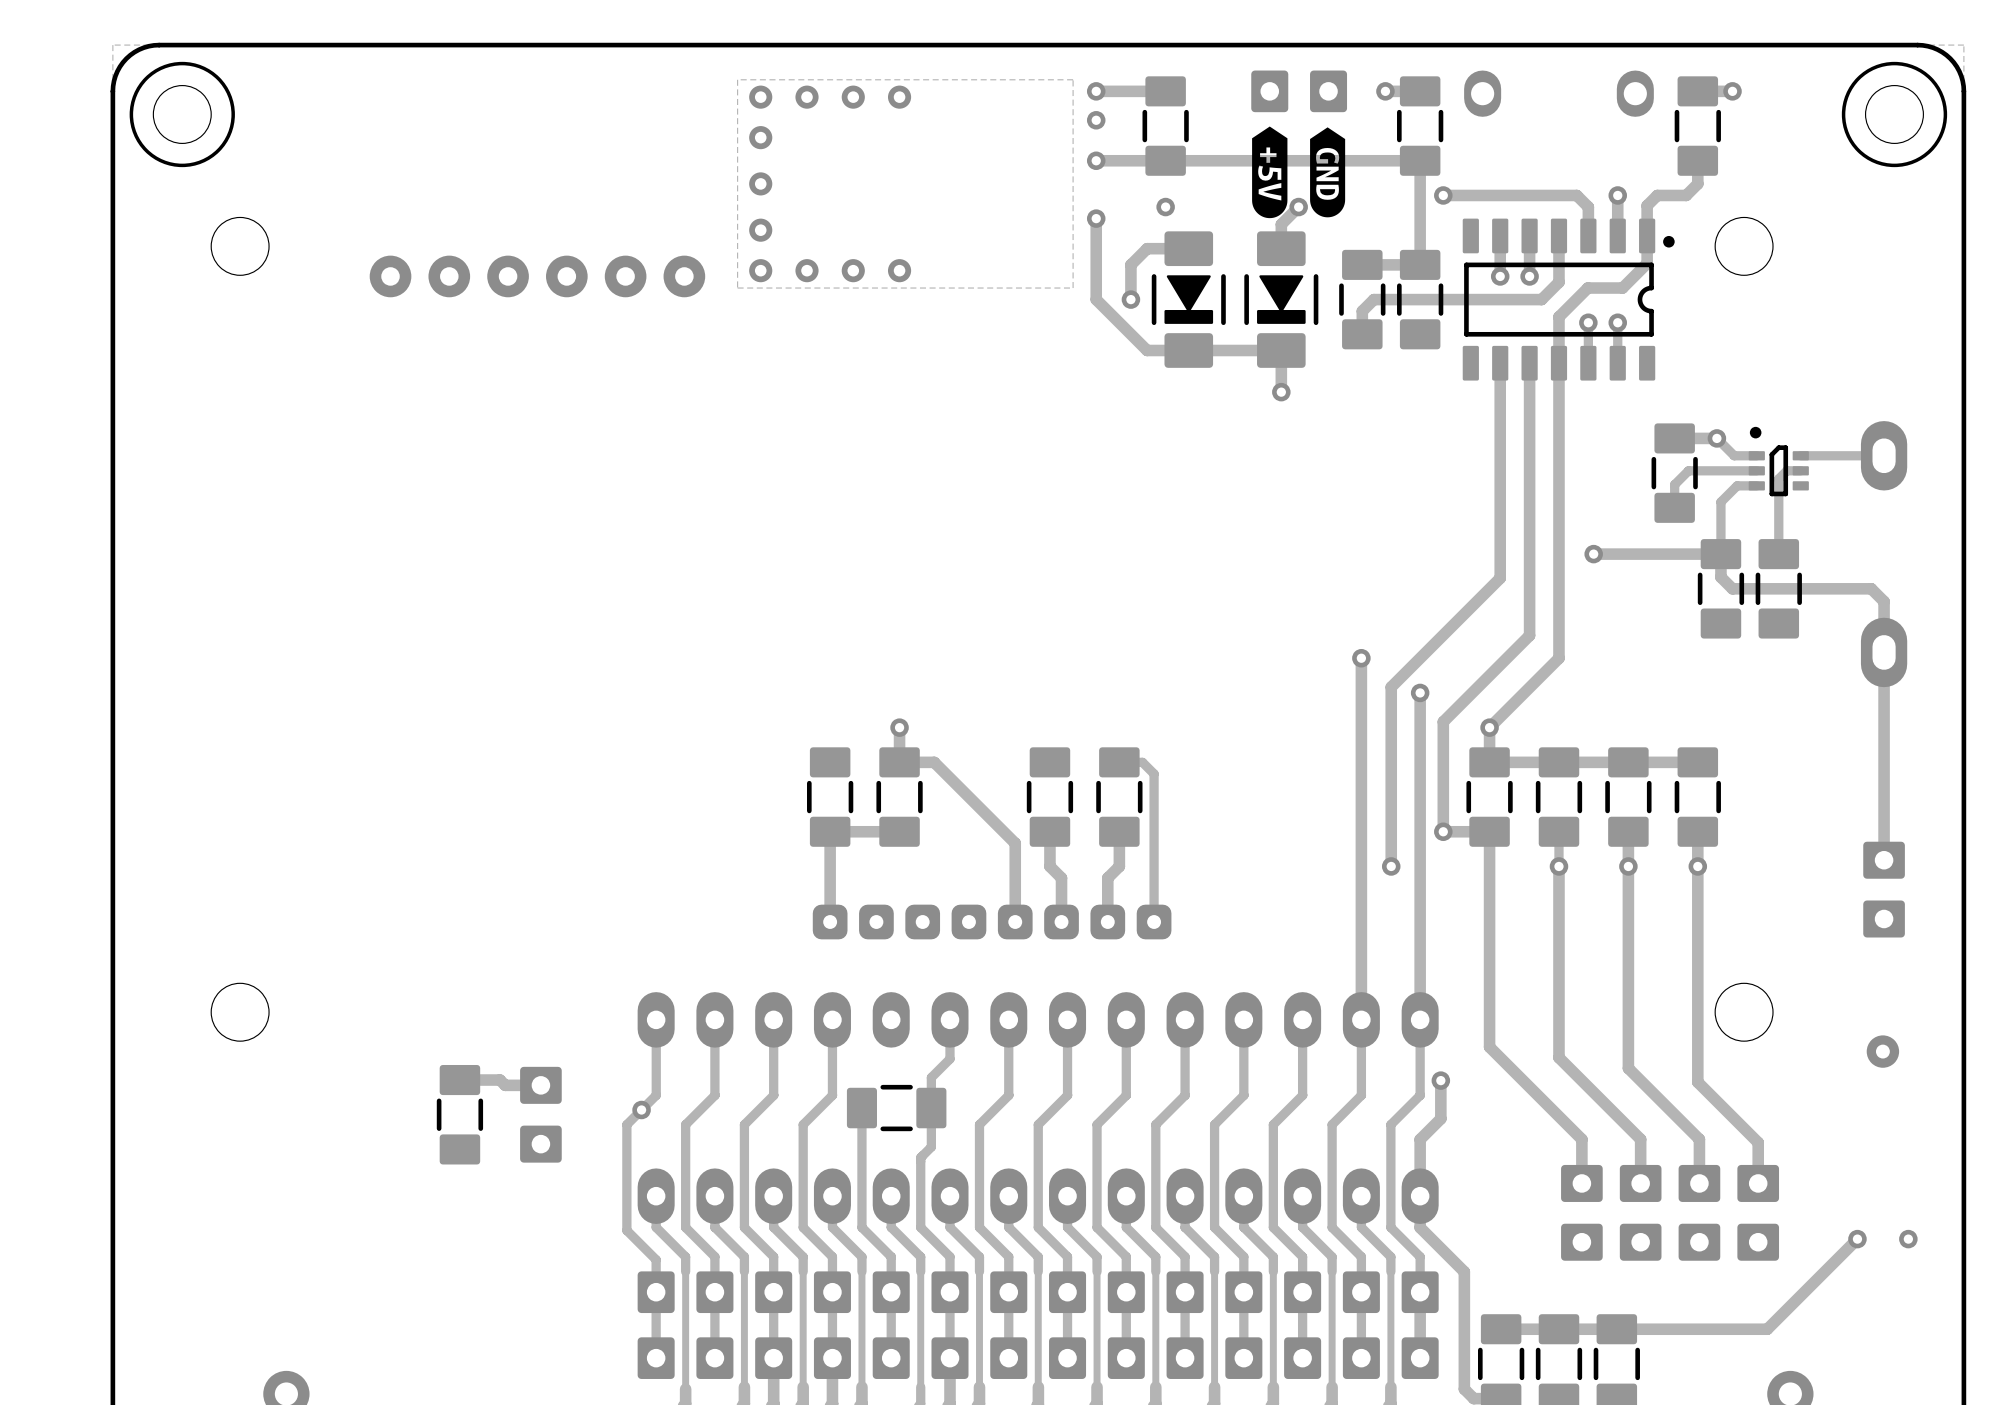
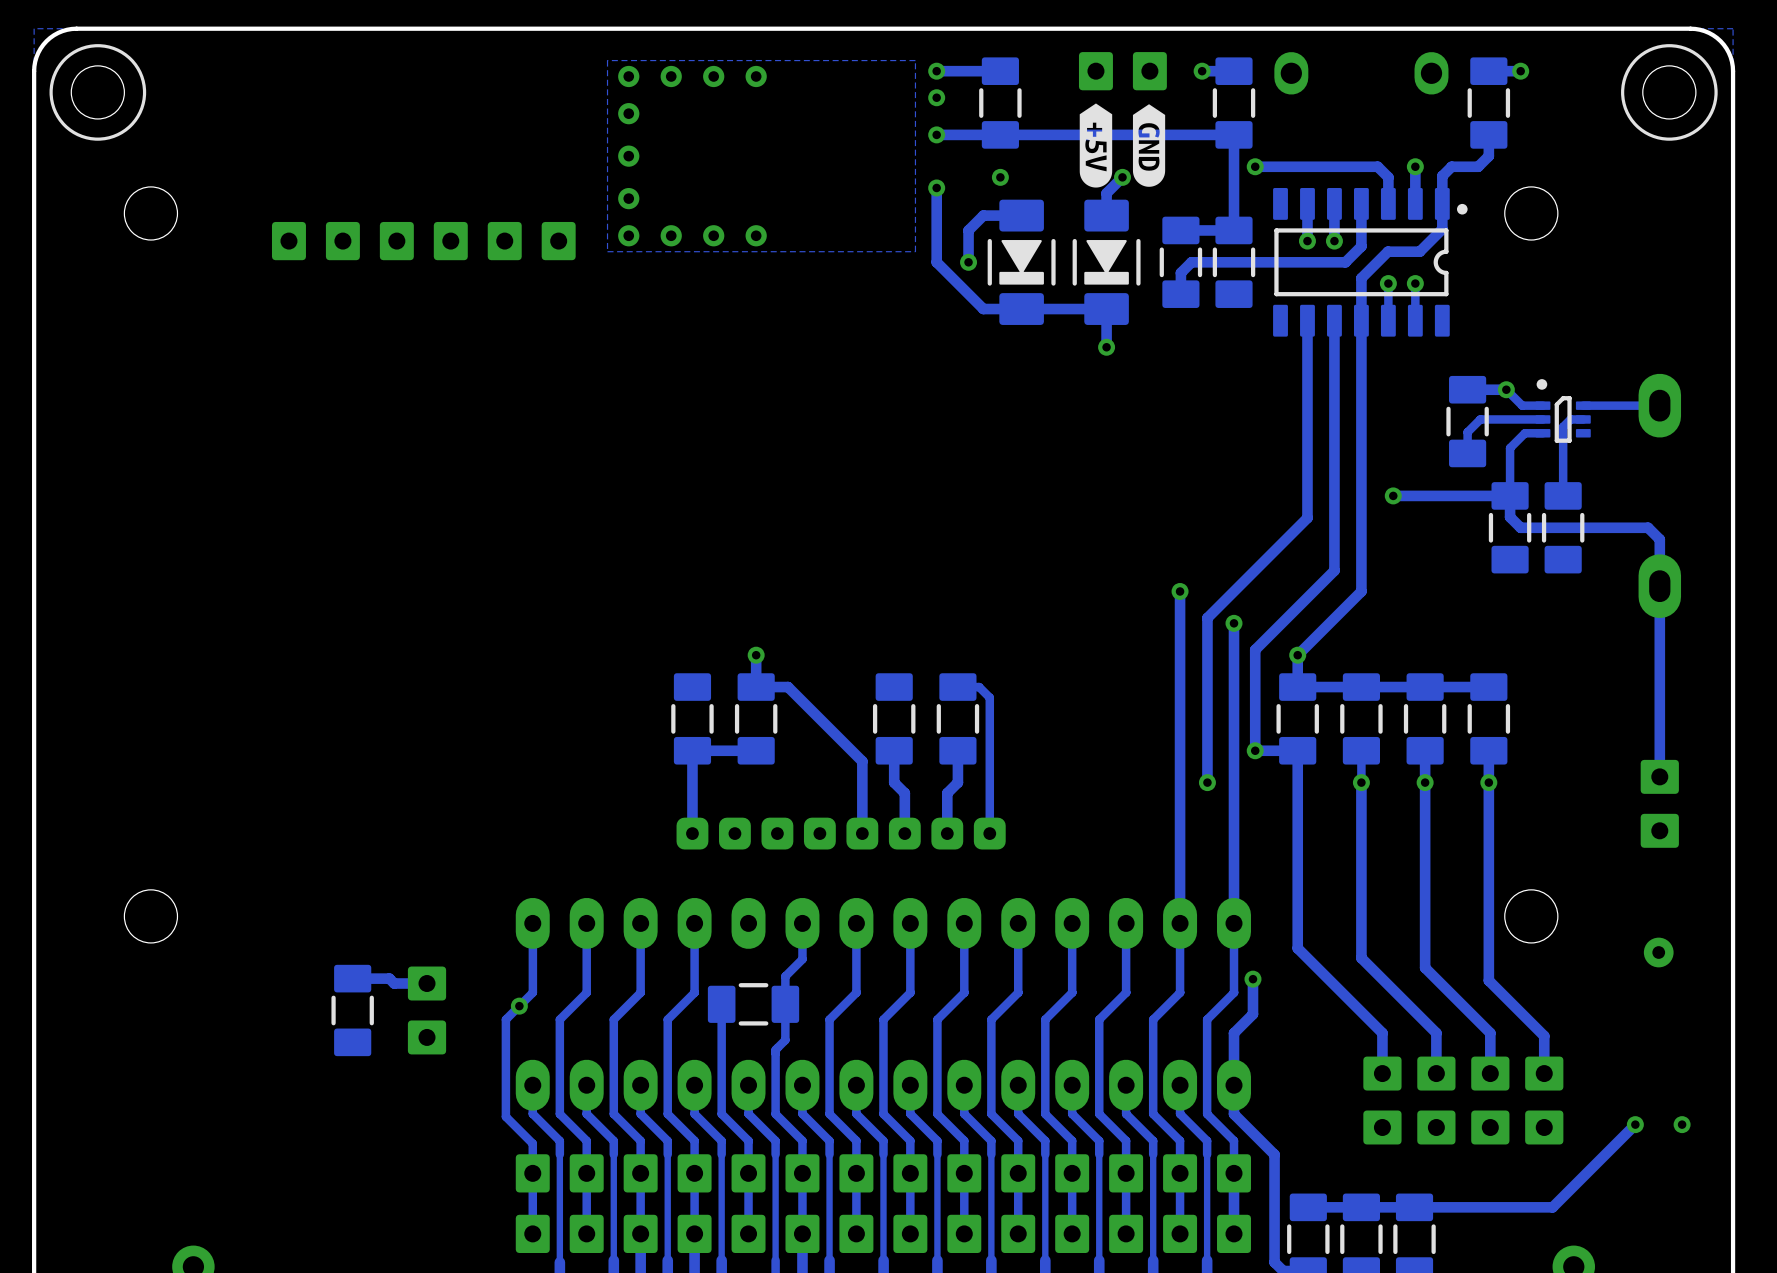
part footprint: [369, 255, 706, 298] -> [271, 221, 576, 261]

